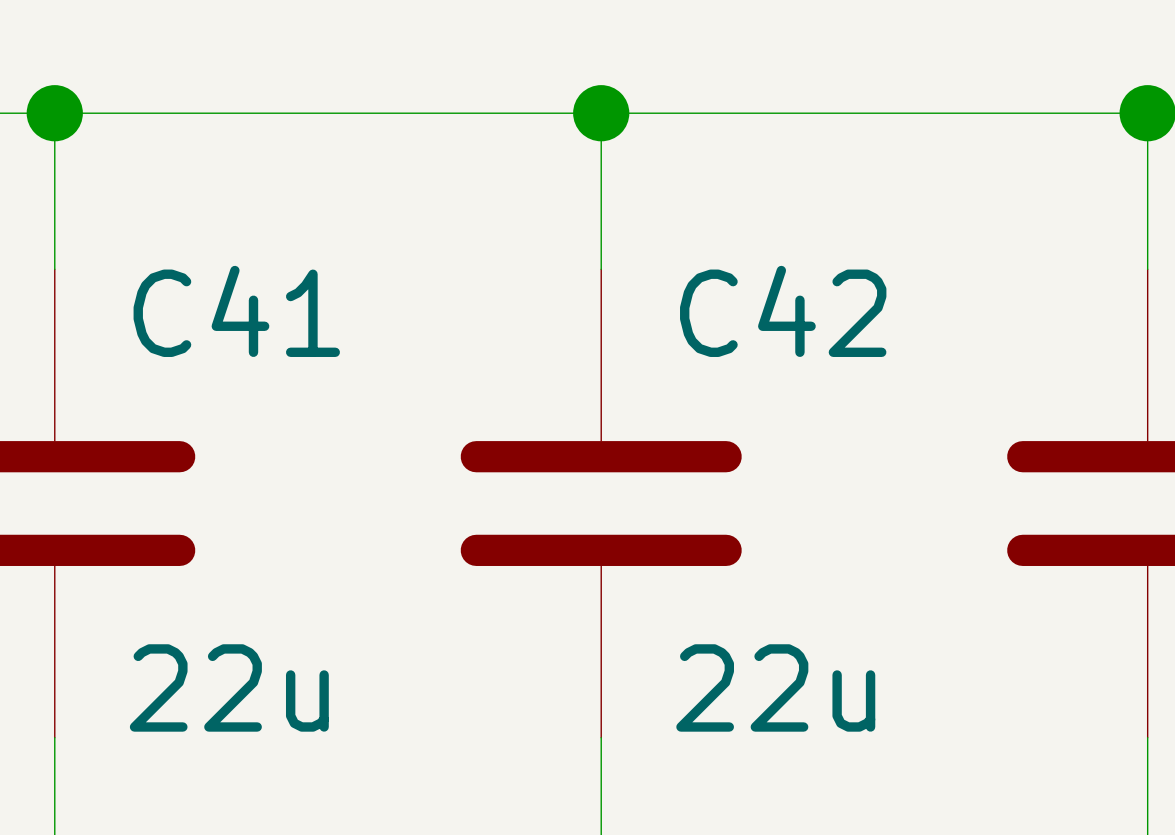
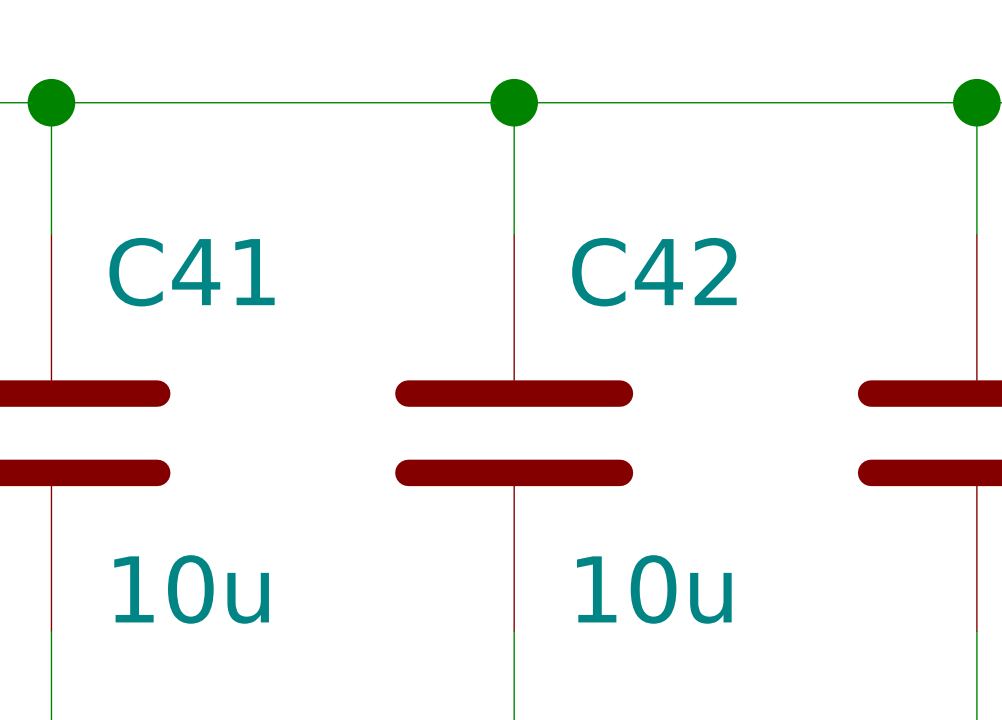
C41 value: 22u (229, 687) -> 10u (191, 589)
C42 value: 22u (775, 687) -> 10u (654, 589)

